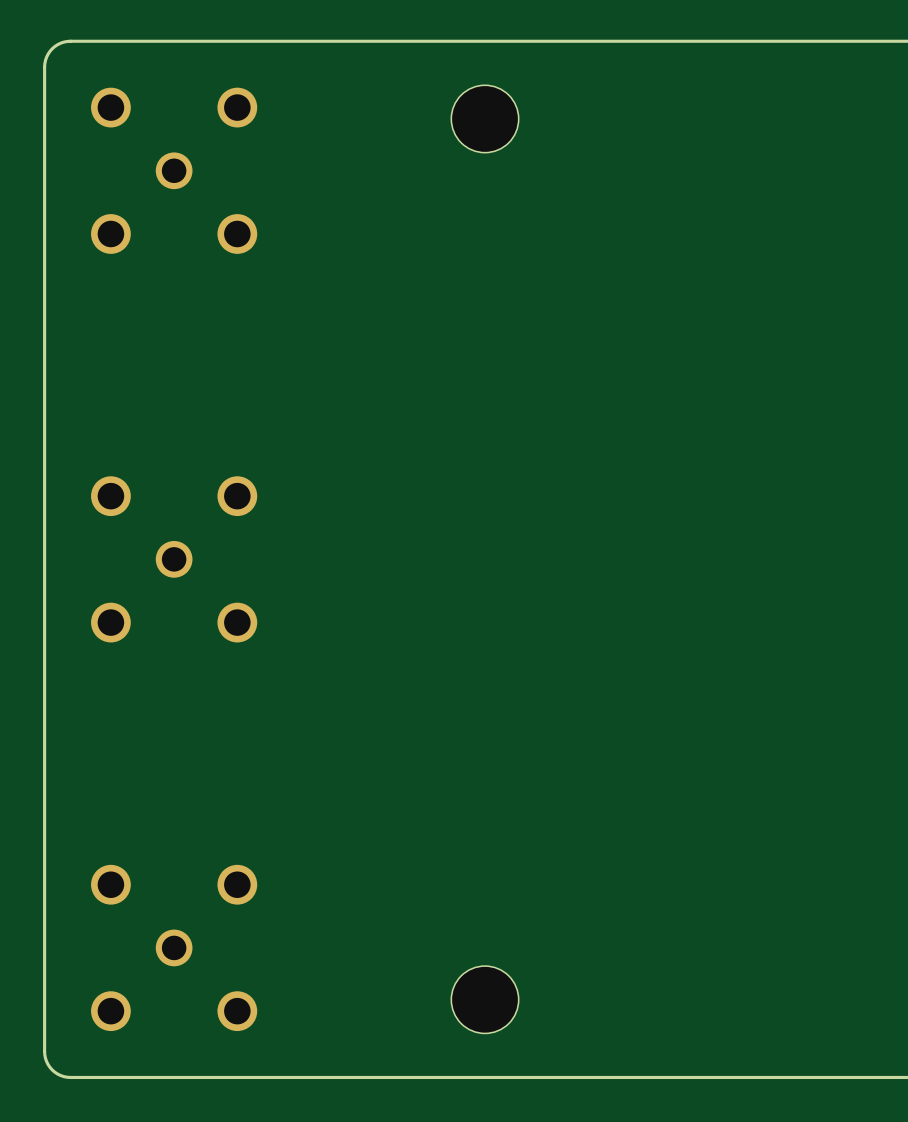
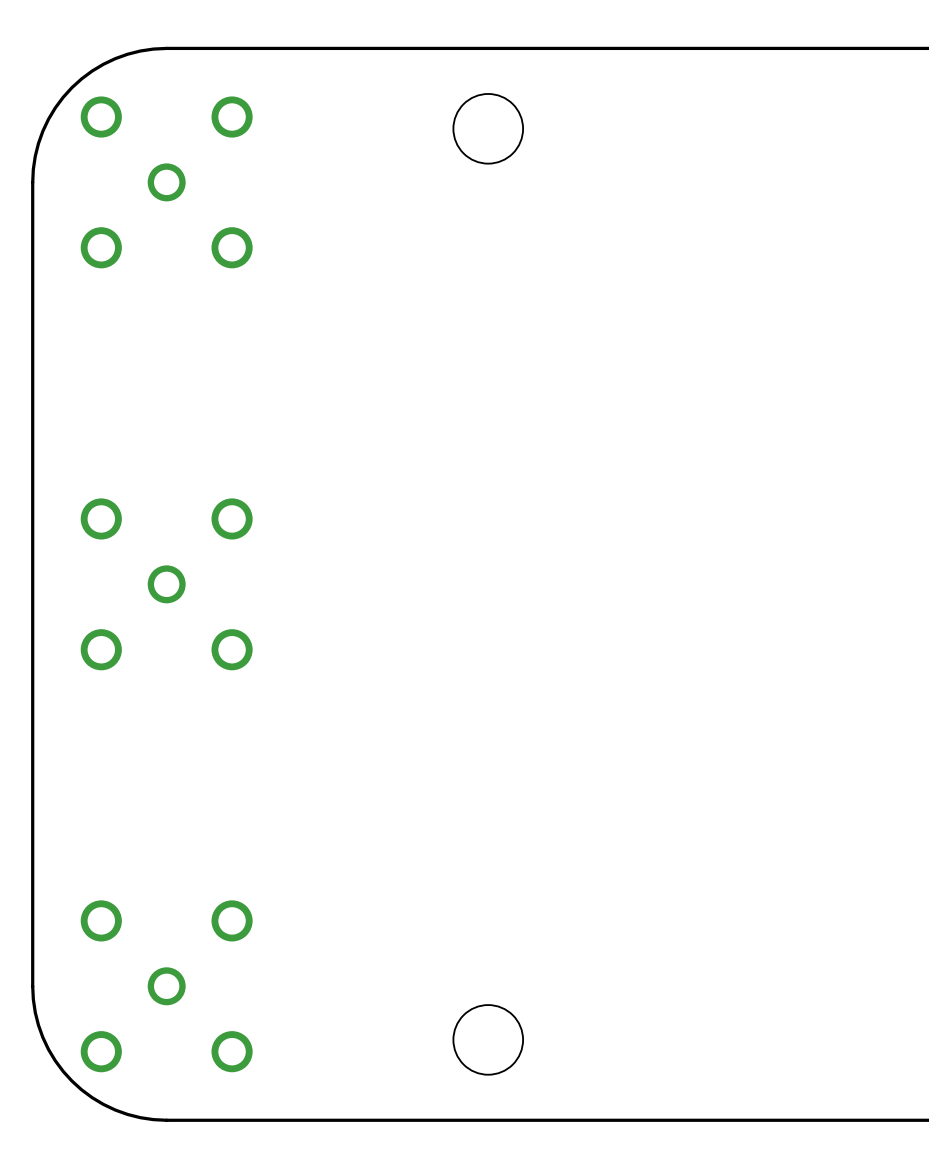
board edge: (174, 41) (70, 41) (60, 43) (52, 48) (46, 57) (44, 67) (44, 170) -> (166, 48) (140, 50) (115, 58) (92, 70) (71, 87) (55, 107) (42, 131) (35, 156) (32, 182)
board edge: (44, 947) (44, 1051) (46, 1061) (52, 1069) (60, 1075) (70, 1077) (174, 1077) -> (32, 986) (35, 1012) (42, 1037) (55, 1060) (71, 1081) (92, 1097) (115, 1110) (140, 1117) (166, 1120)

